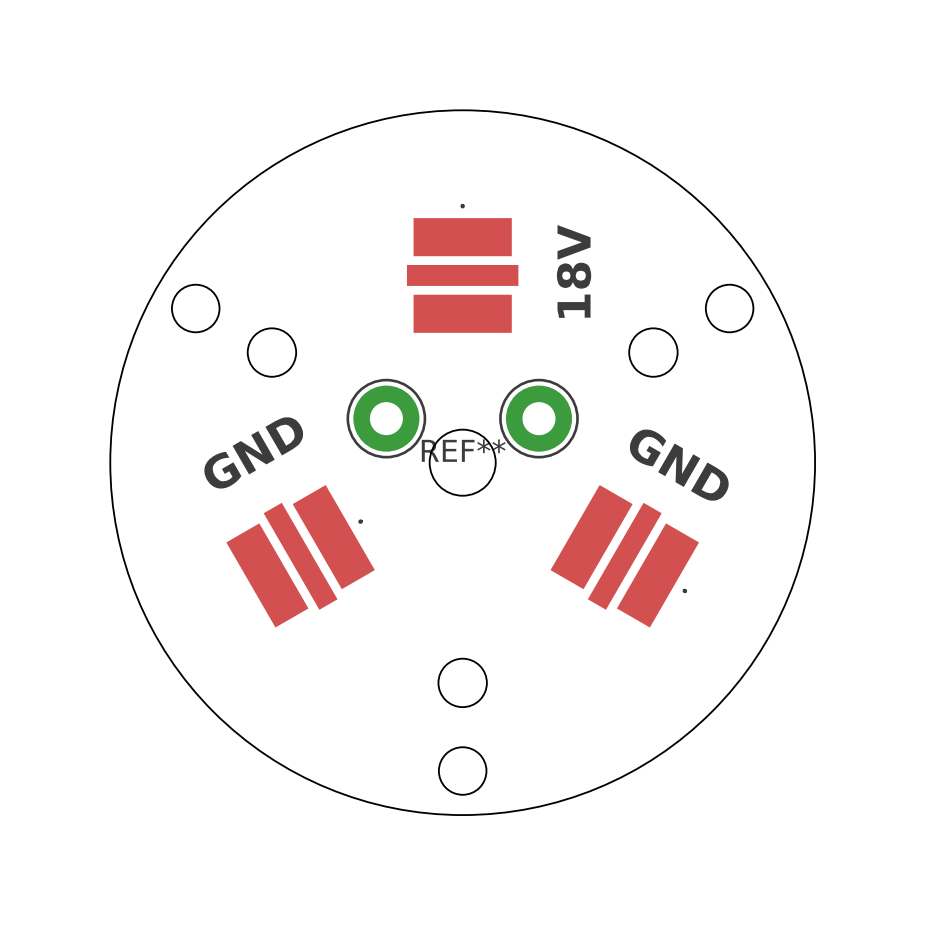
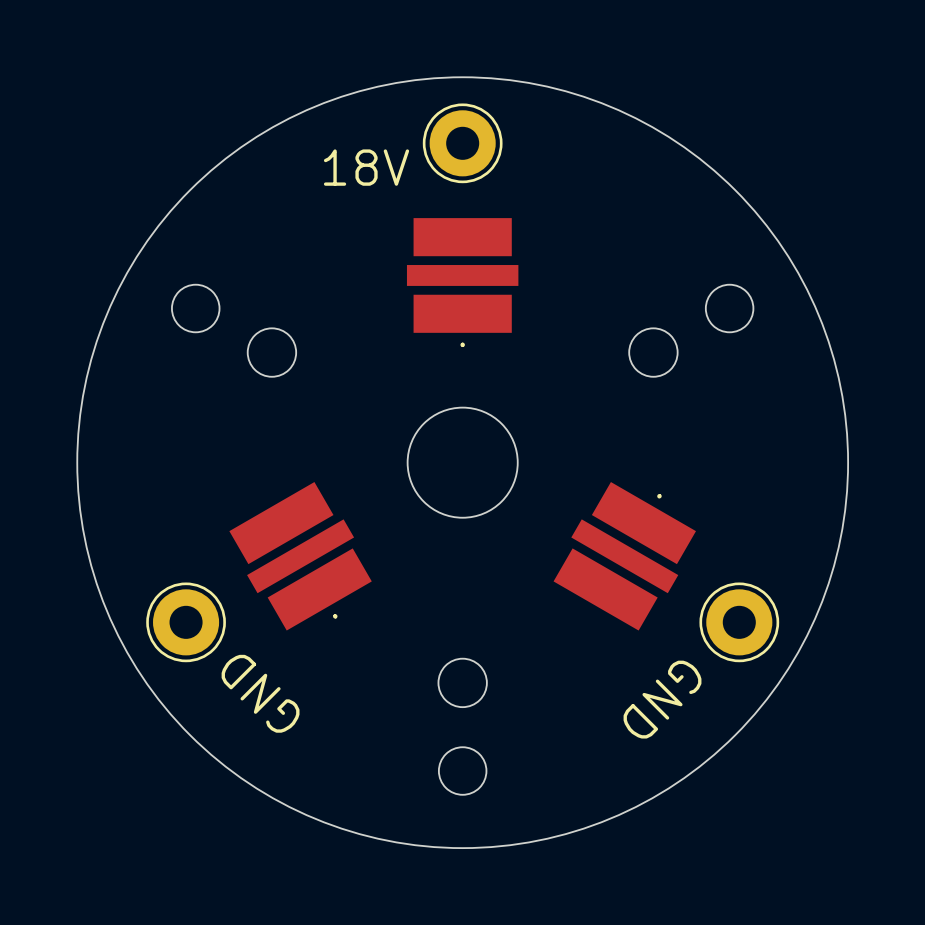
round board edge: none -> [76, 76, 849, 849]
round board edge: [109, 109, 816, 816] -> none
part: none -> (462, 143)
part rotation: 0° (462, 268) -> 180° (462, 282)
text rotation: 0° (574, 271) -> 90° clockwise (366, 167)
text position: 18V (574, 271) -> 18V (366, 167)
round board edge: none -> [407, 407, 519, 519]
part: (386, 418) -> none
part: (538, 418) -> none
round board edge: [429, 429, 497, 497] -> none
text: GND (253, 453) -> none
text: GND (678, 464) -> none
part footprint: [550, 485, 700, 628] -> [553, 482, 697, 631]
REF**: (462, 539) -> none
part rotation: 0° (300, 556) -> 90° clockwise (300, 556)
part: none -> (186, 622)
part: none -> (739, 622)
text: none -> GND (260, 693)
text: none -> GND (662, 699)

